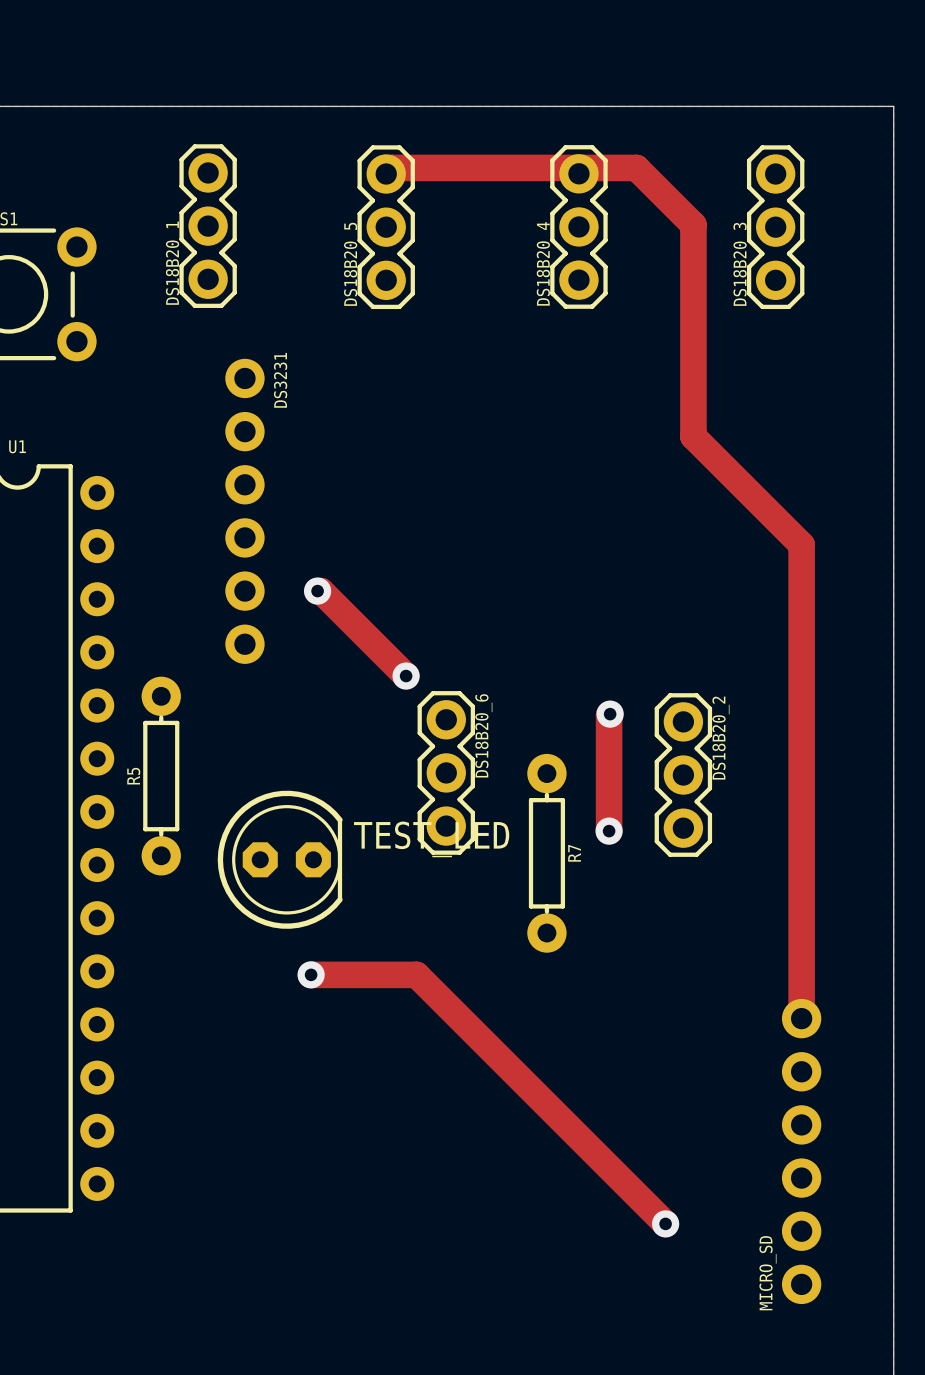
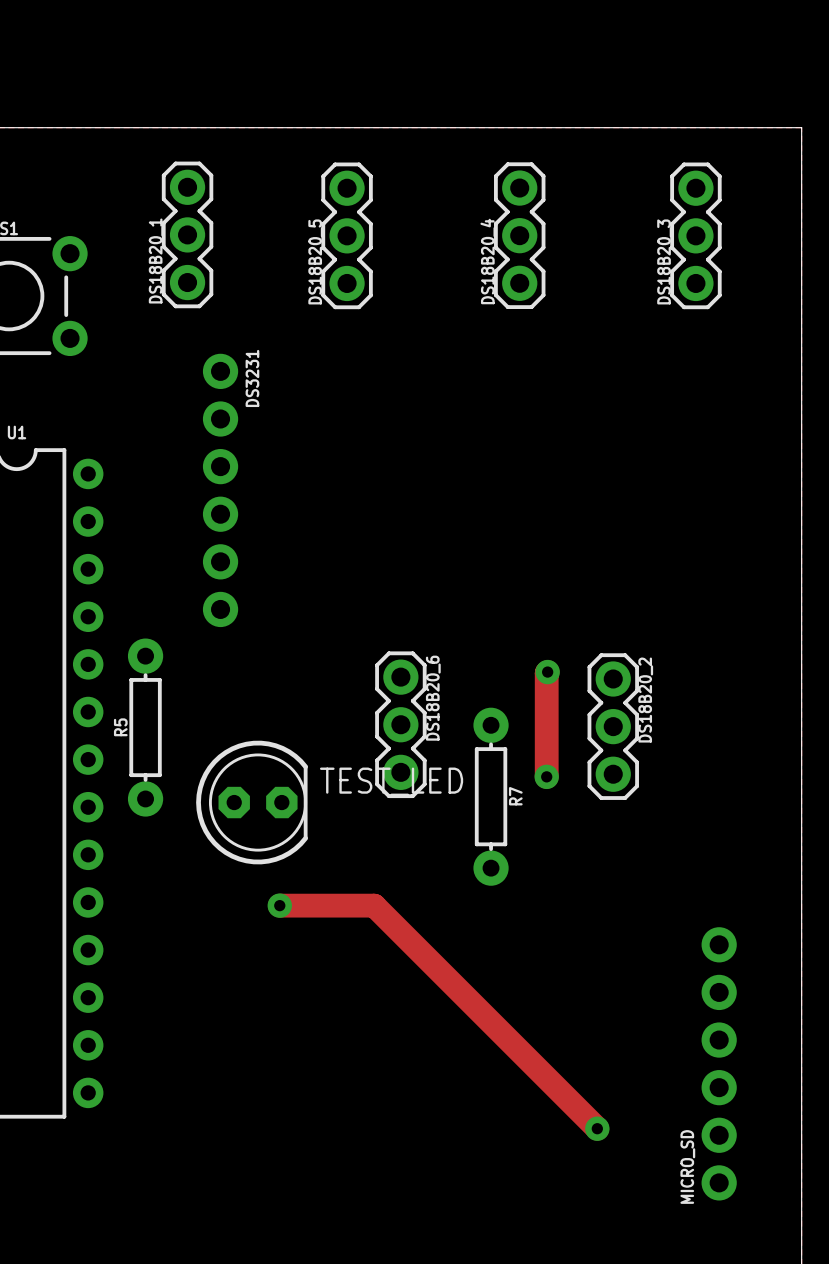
track: (386, 174) (392, 167) (636, 167) (693, 224) (693, 436) (801, 544) (801, 1018) -> none
track: (317, 591) (321, 591) (406, 676) -> none
via: (317, 591) -> none
via: (406, 676) -> none

